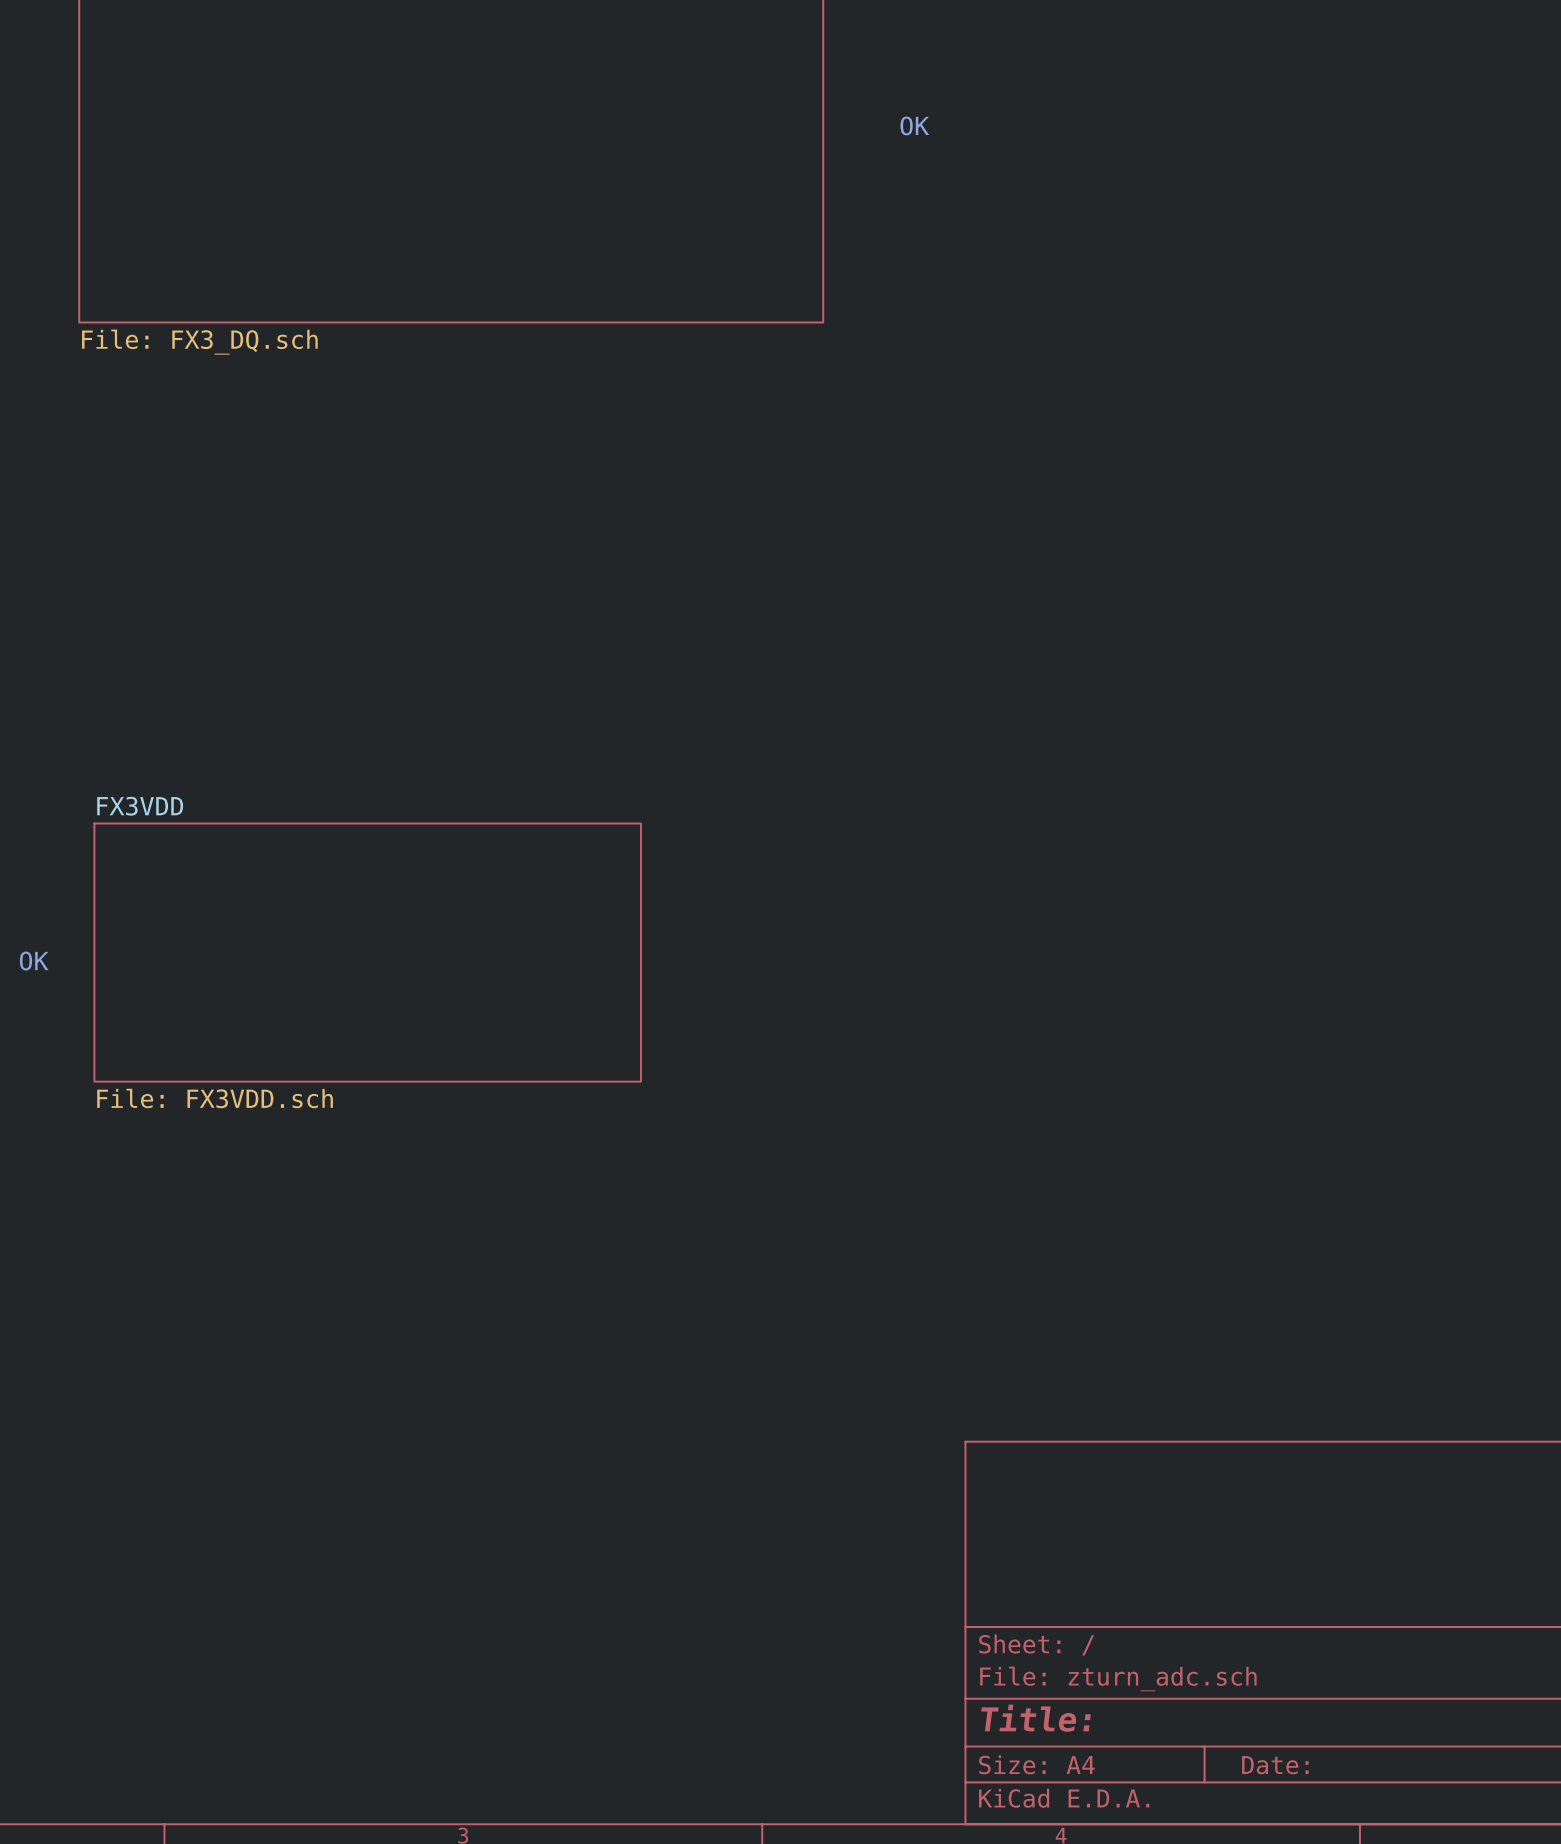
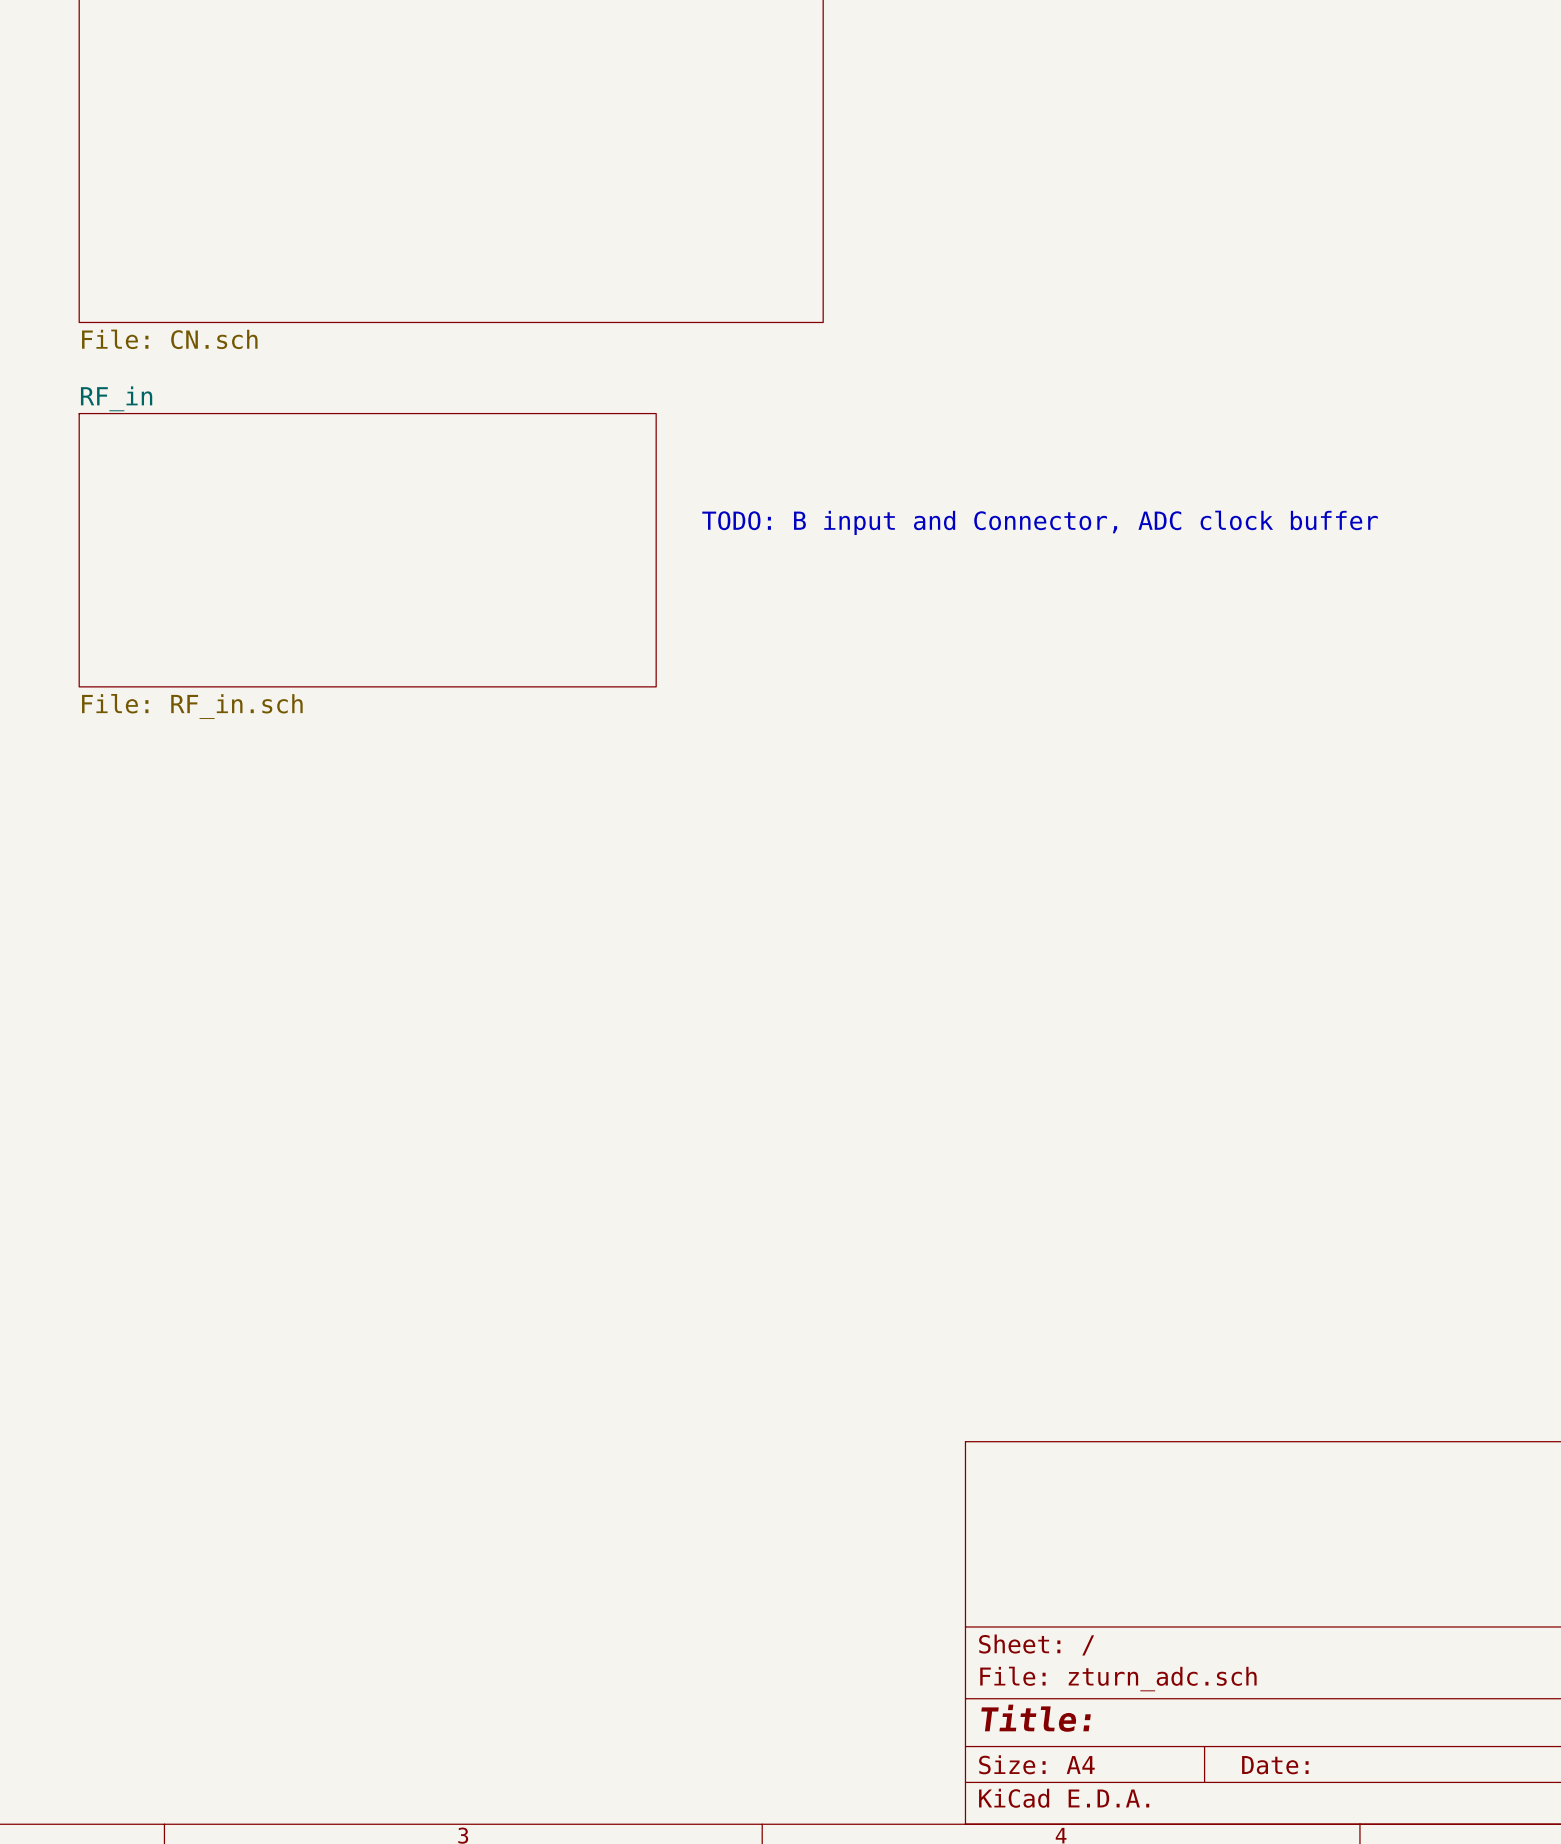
text: OK (914, 125) -> none
sheet value: File: FX3_DQ.sch (199, 342) -> File: CN.sch (169, 339)
text: none -> TODO: B input and Connector, ADC clock buffer (1040, 522)
sheet RF_in: none -> File: RF_in.sch (367, 550)
sheet FX3VDD: File: FX3VDD.sch (367, 952) -> none
text: OK (34, 961) -> none

